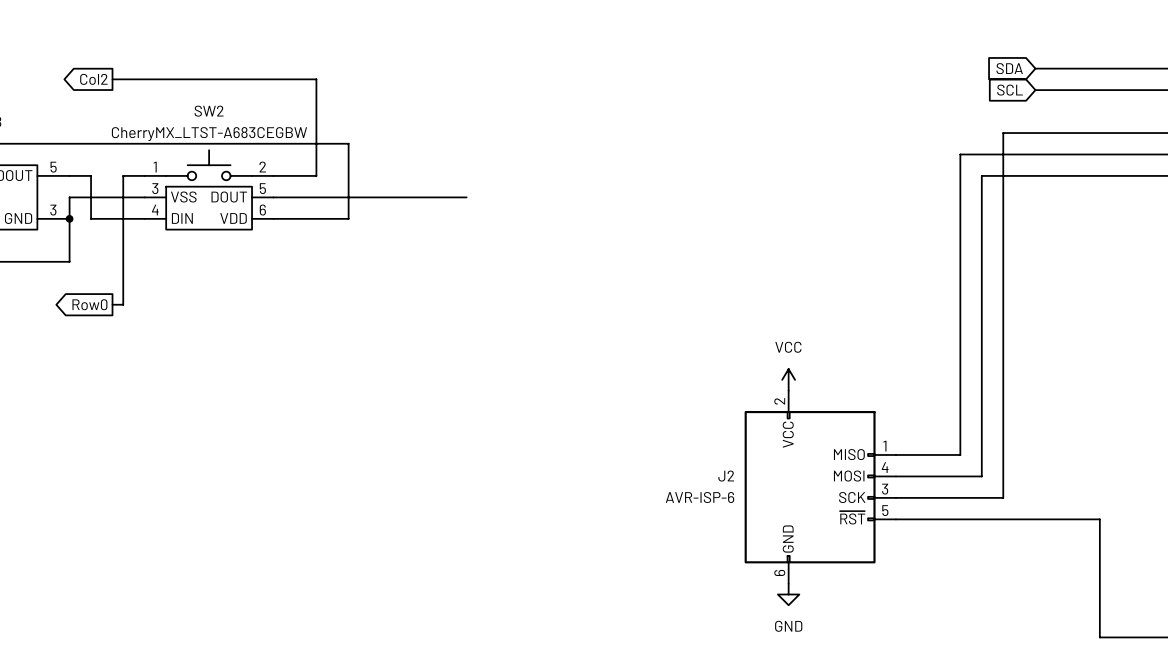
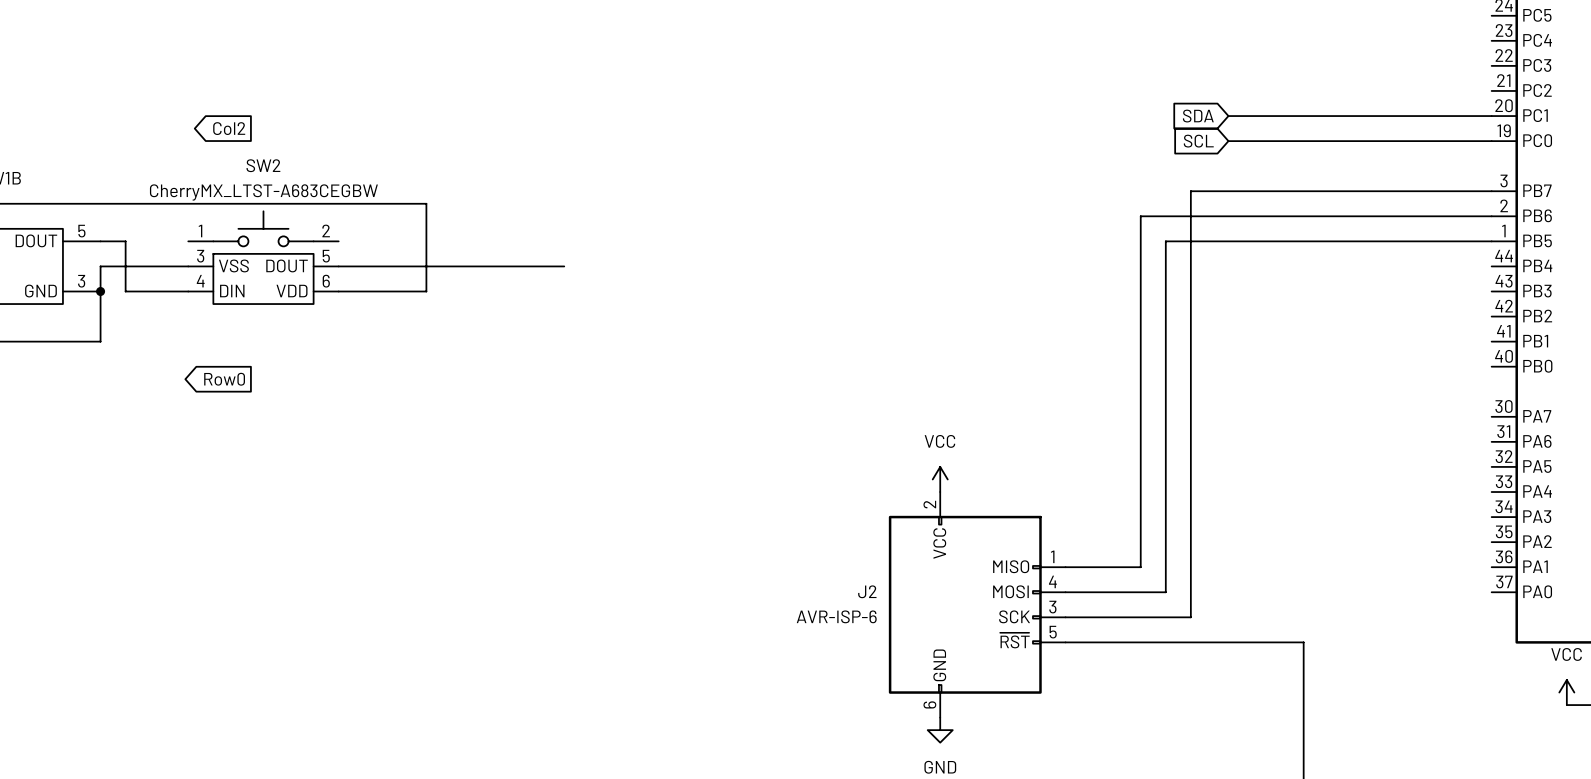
global label position: Col2 (93, 79) -> Col2 (229, 128)
wire: (112, 79) (316, 79) (316, 175) (273, 175) -> none
wire: (144, 175) (123, 175) (123, 304) (112, 304) -> none
global label position: Row0 (89, 304) -> Row0 (224, 379)

